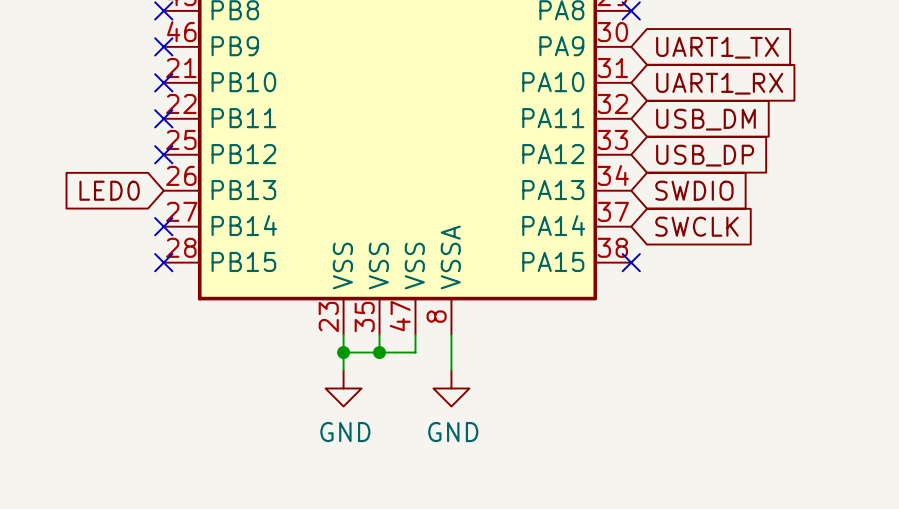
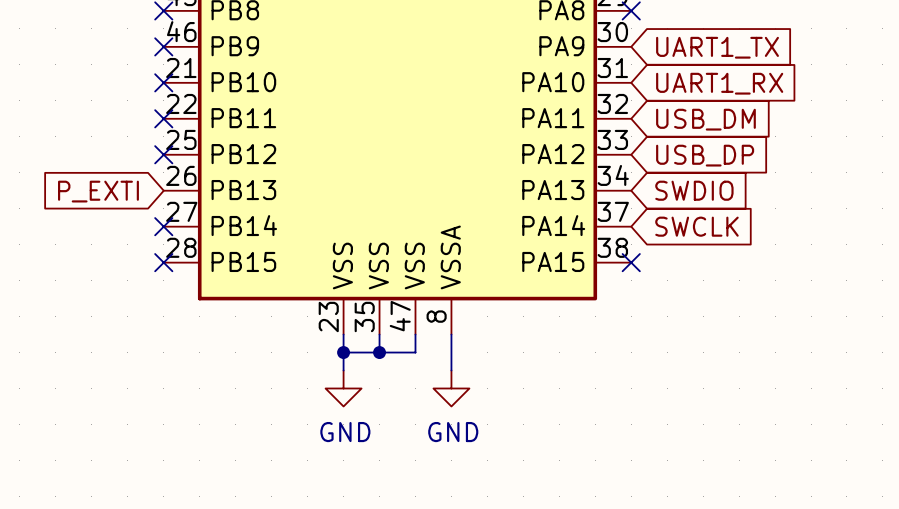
global label: LED0 (109, 190) -> P_EXTI (98, 191)

